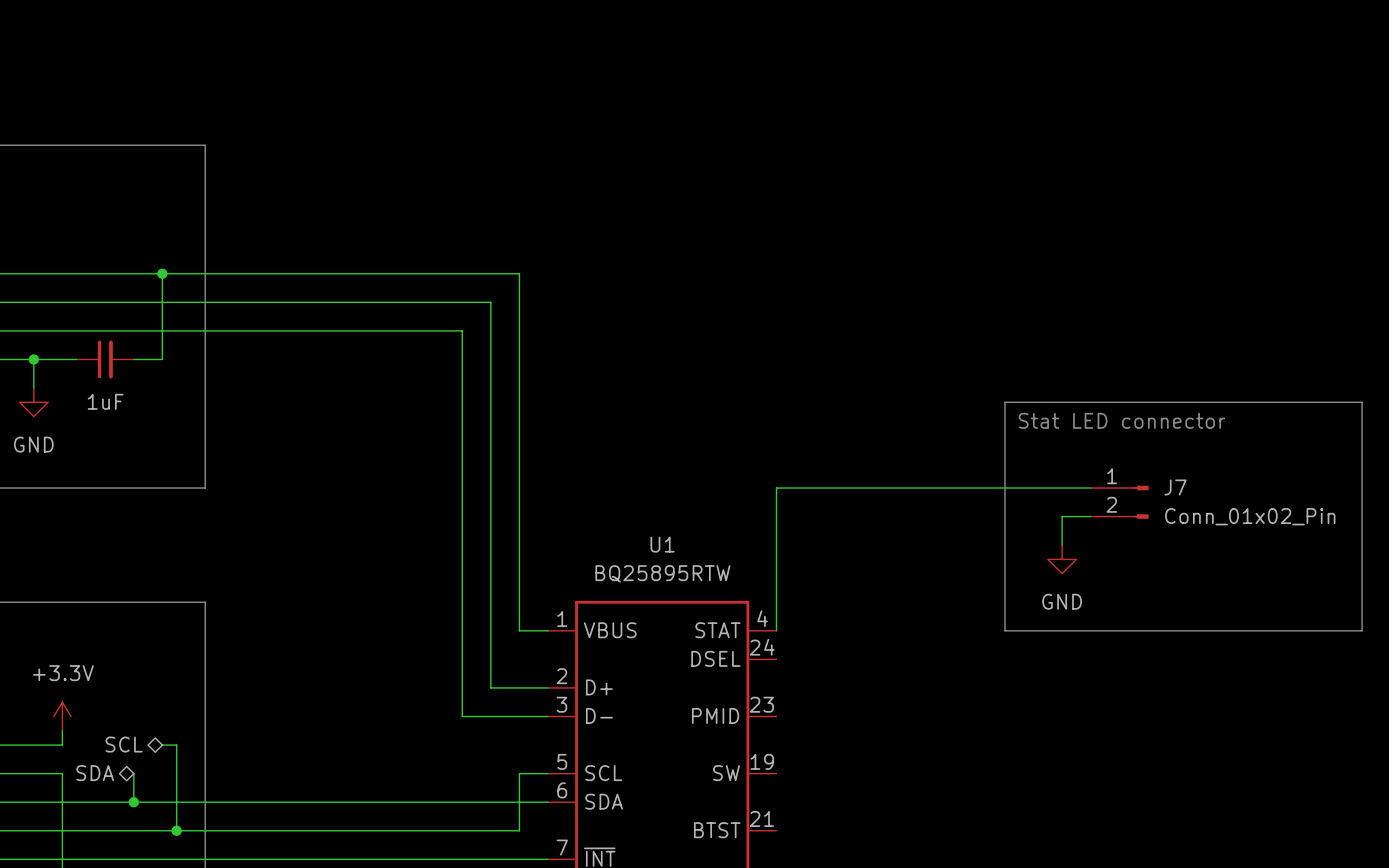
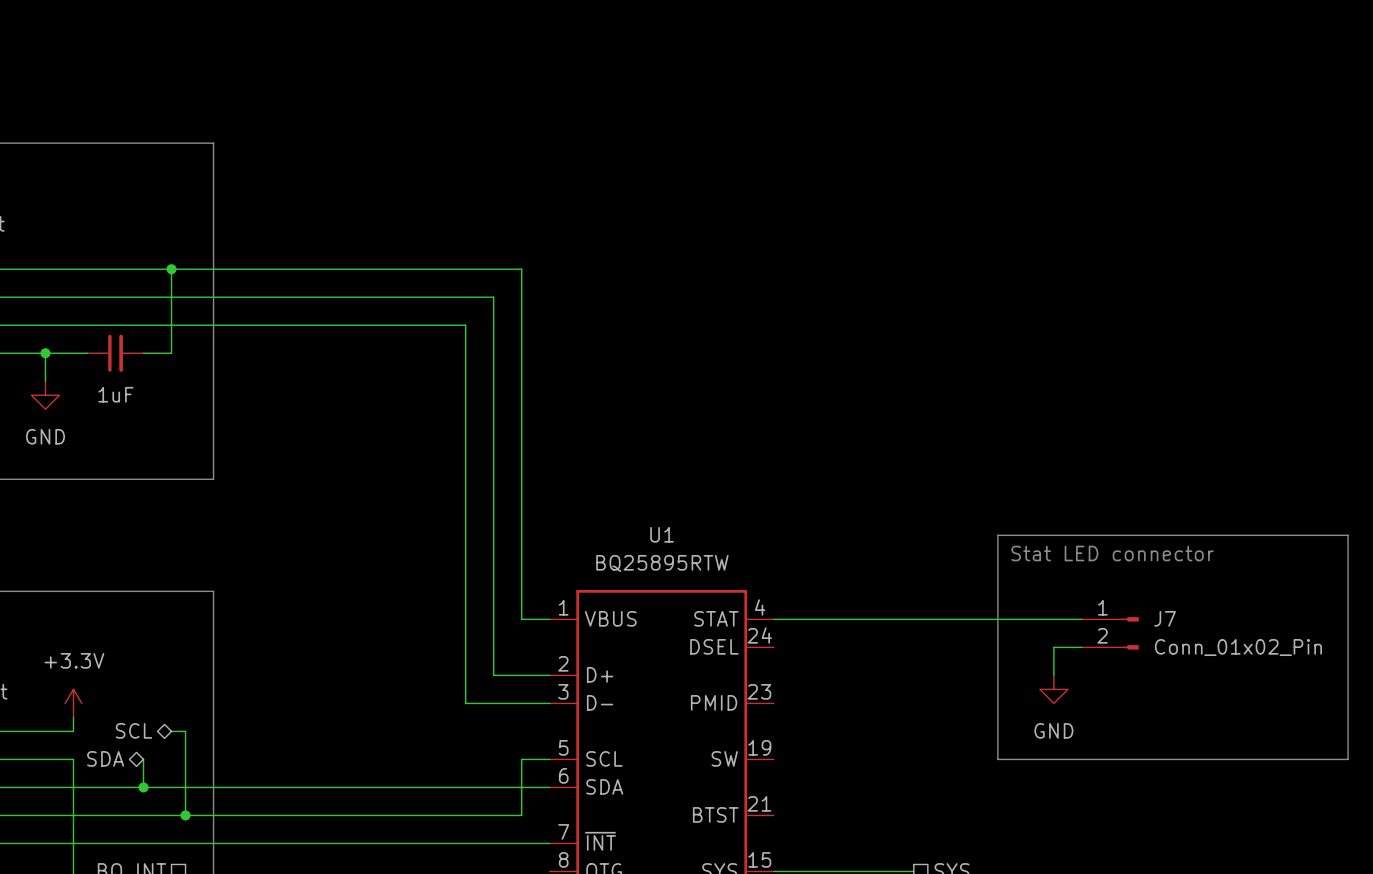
text position: Stat LED connector (1121, 420) -> Stat LED connector (1112, 553)
wire: (1090, 488) (776, 488) (776, 630) -> (1081, 619) (773, 619)
J7 position: (1119, 502) -> (1110, 633)
wire: (1090, 516) (1062, 516) (1062, 545) -> (1081, 647) (1053, 647) (1053, 675)
line: (1004, 545) (1004, 402) (1362, 402) (1362, 545) -> (997, 535) (1348, 535)
power symbol position: GND (1062, 559) -> GND (1053, 689)
line: (1004, 630) (1362, 630) -> (997, 619) (997, 759) (1348, 759) (1348, 619)

